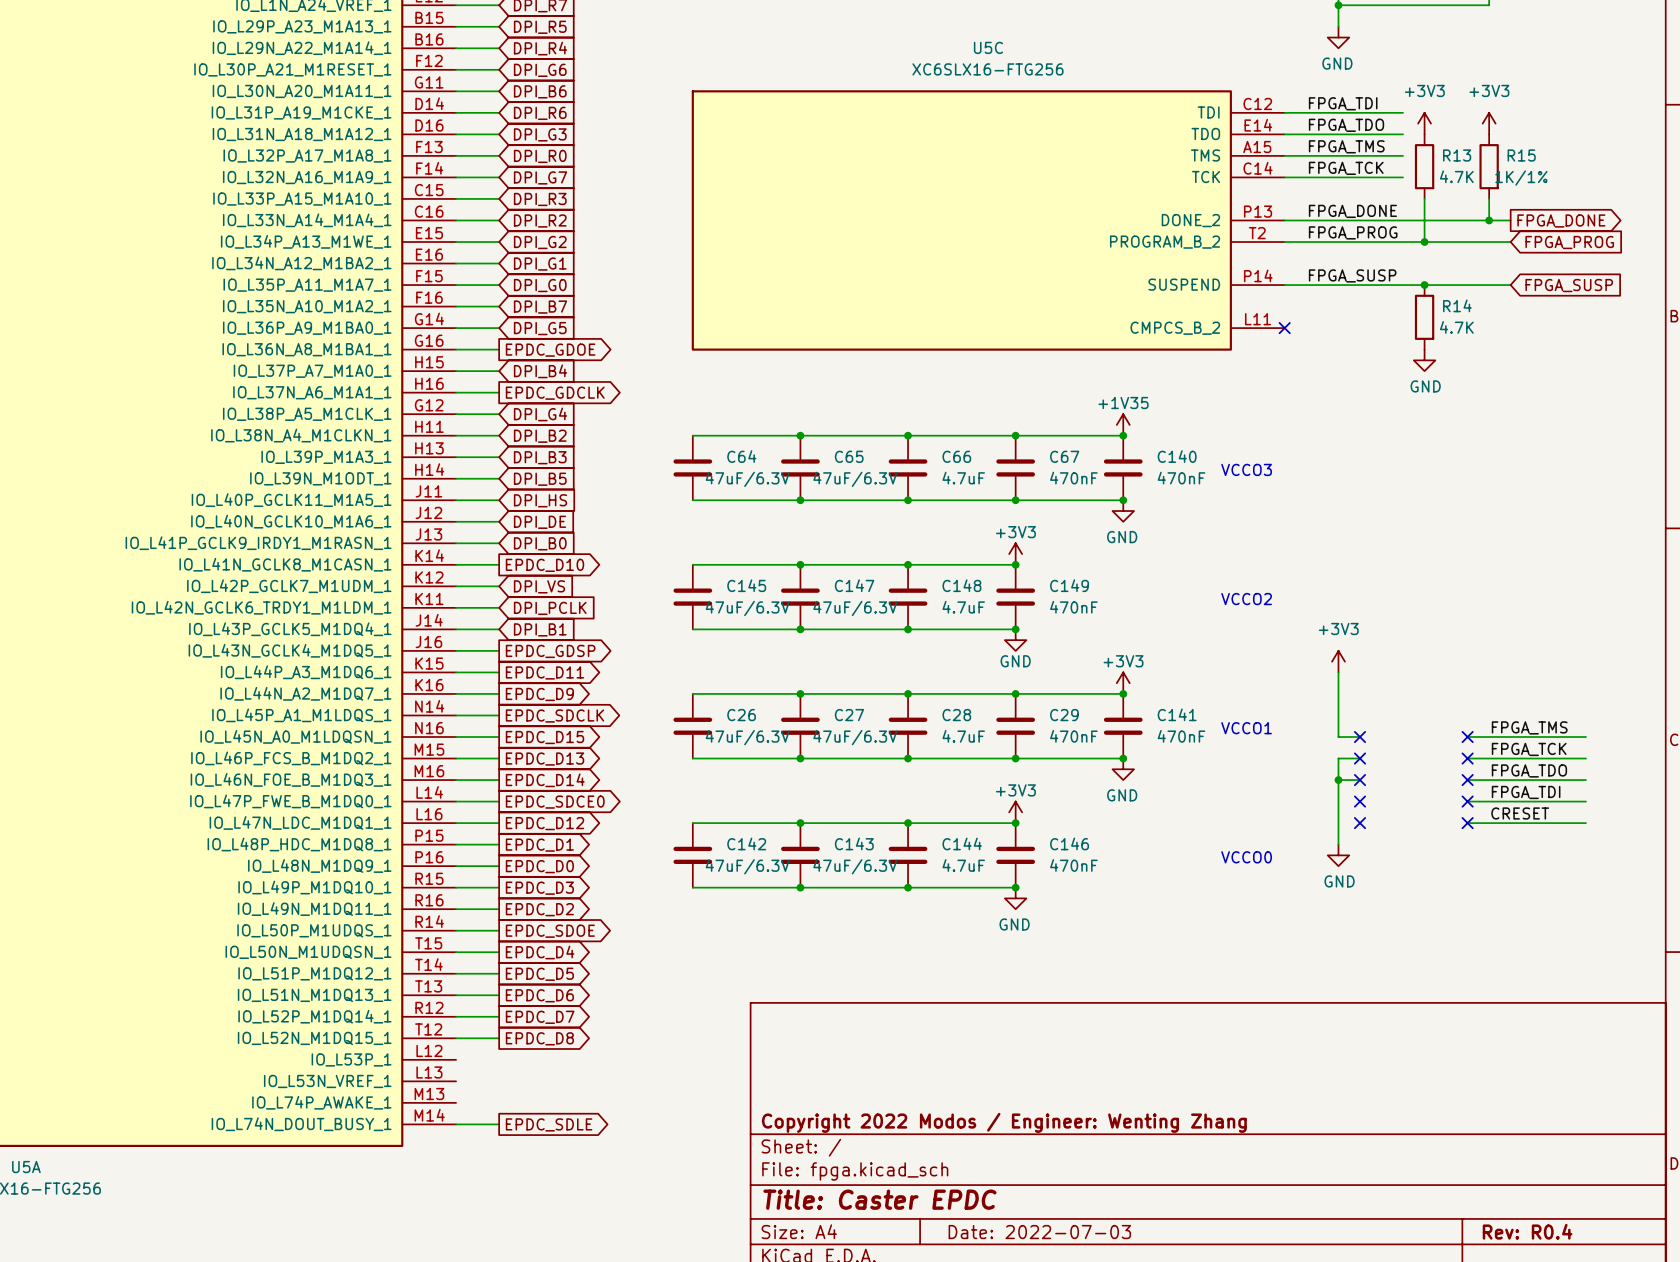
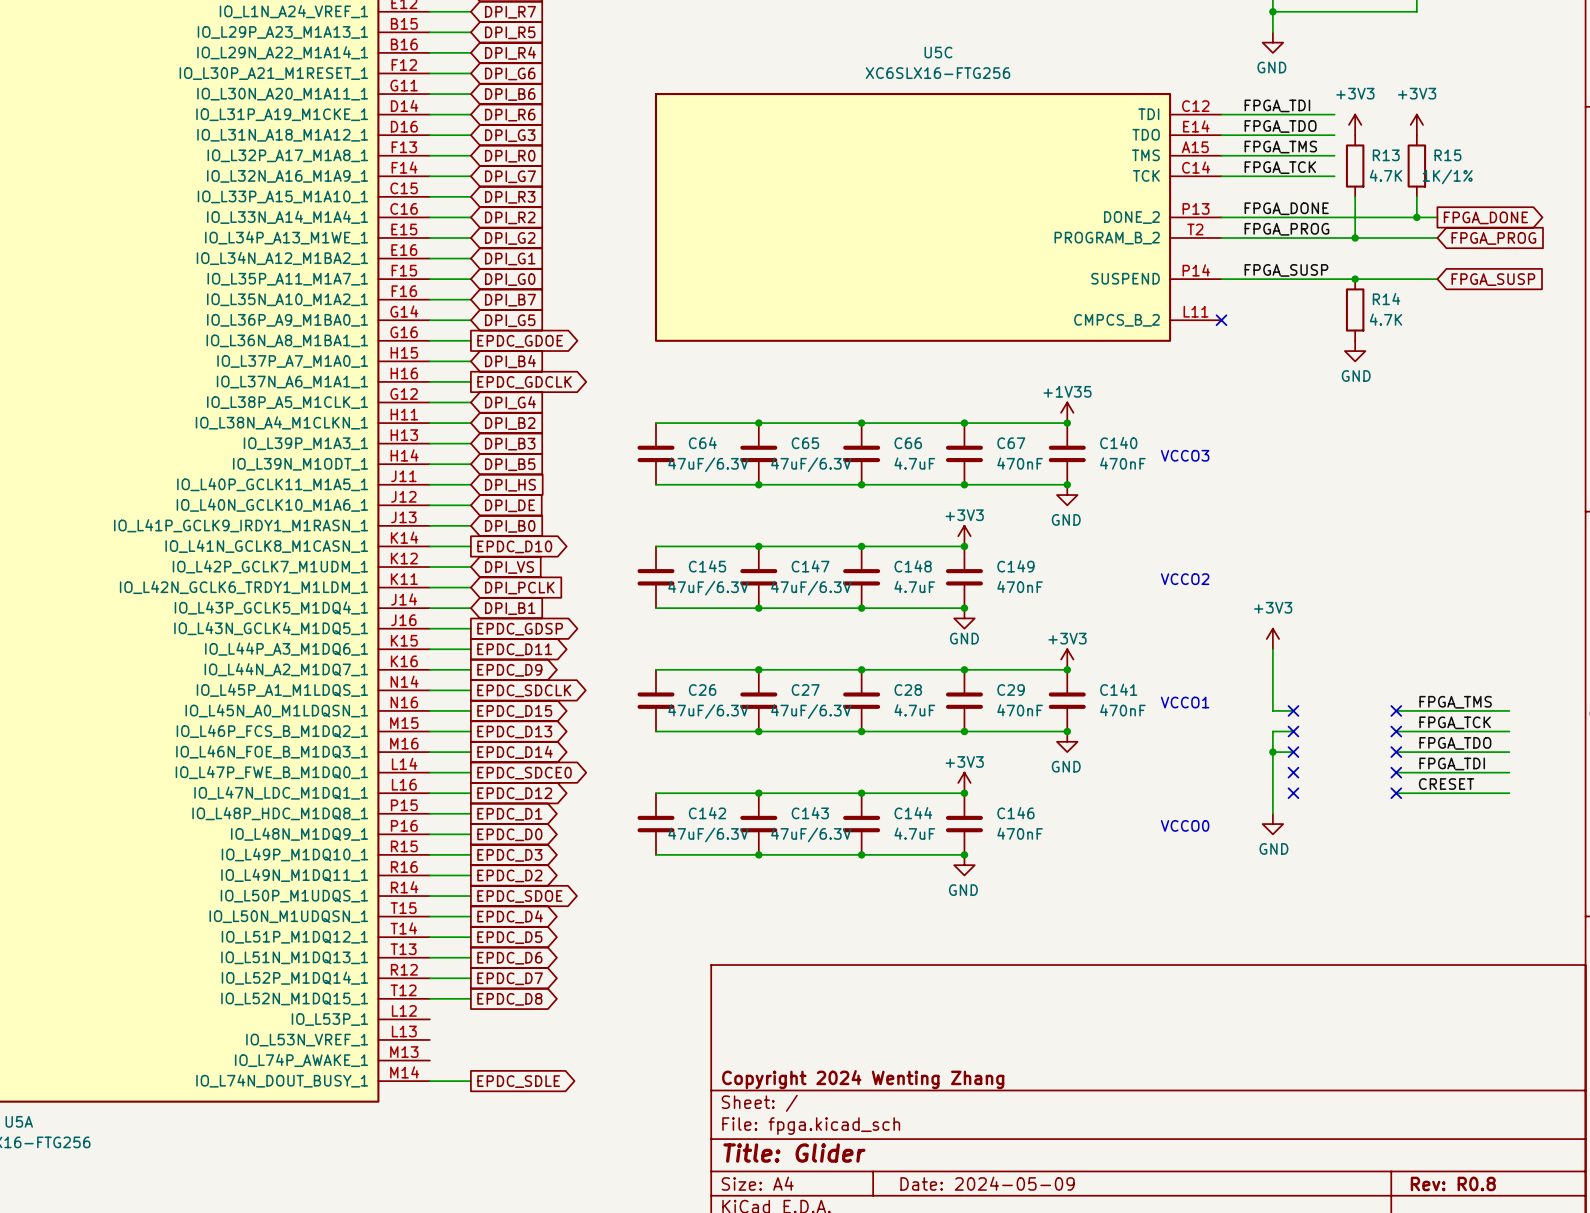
title block: Copyright 2022 Modos / Engineer: Wenting Zhang (1004, 1122) -> Copyright 2024 Wenting Zhang (863, 1079)
title block: Title: Caster EPDC (879, 1199) -> Title: Glider (794, 1153)
title block: Rev: R0.4 (1527, 1231) -> Rev: R0.8 (1453, 1183)
title block: Date: 2022-07-03 (1039, 1232) -> Date: 2024-05-09 (987, 1183)

